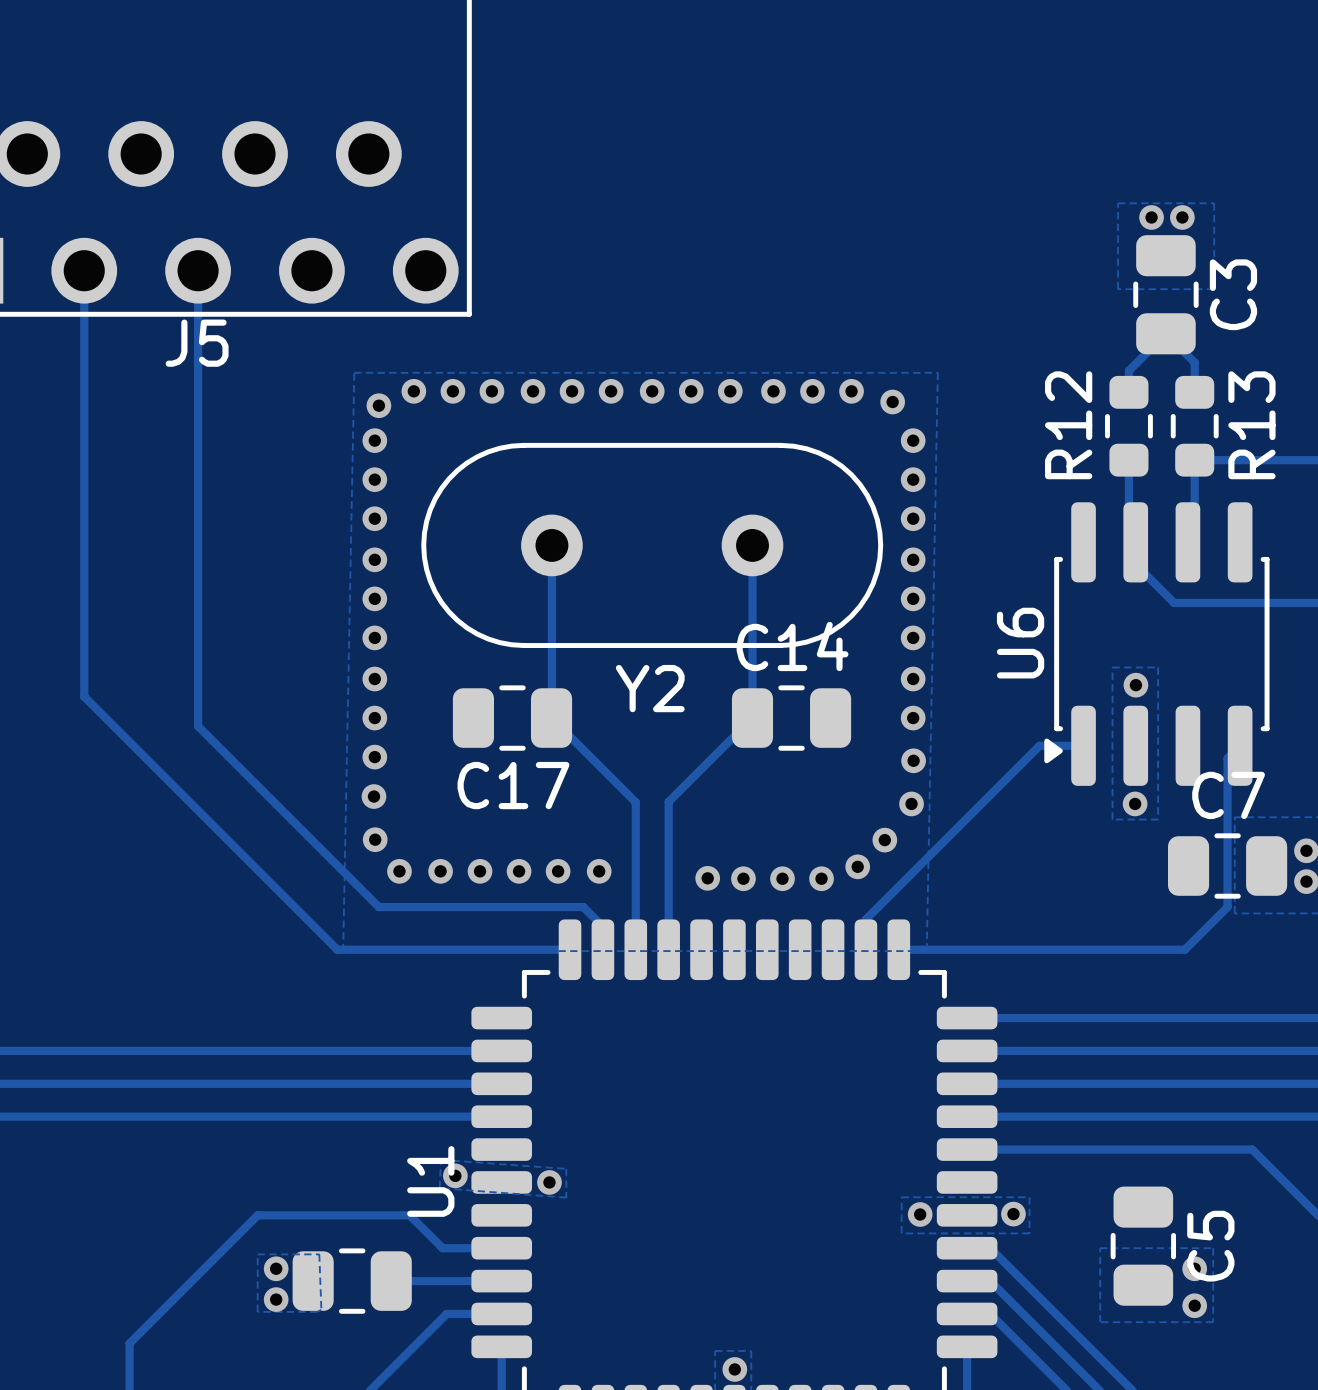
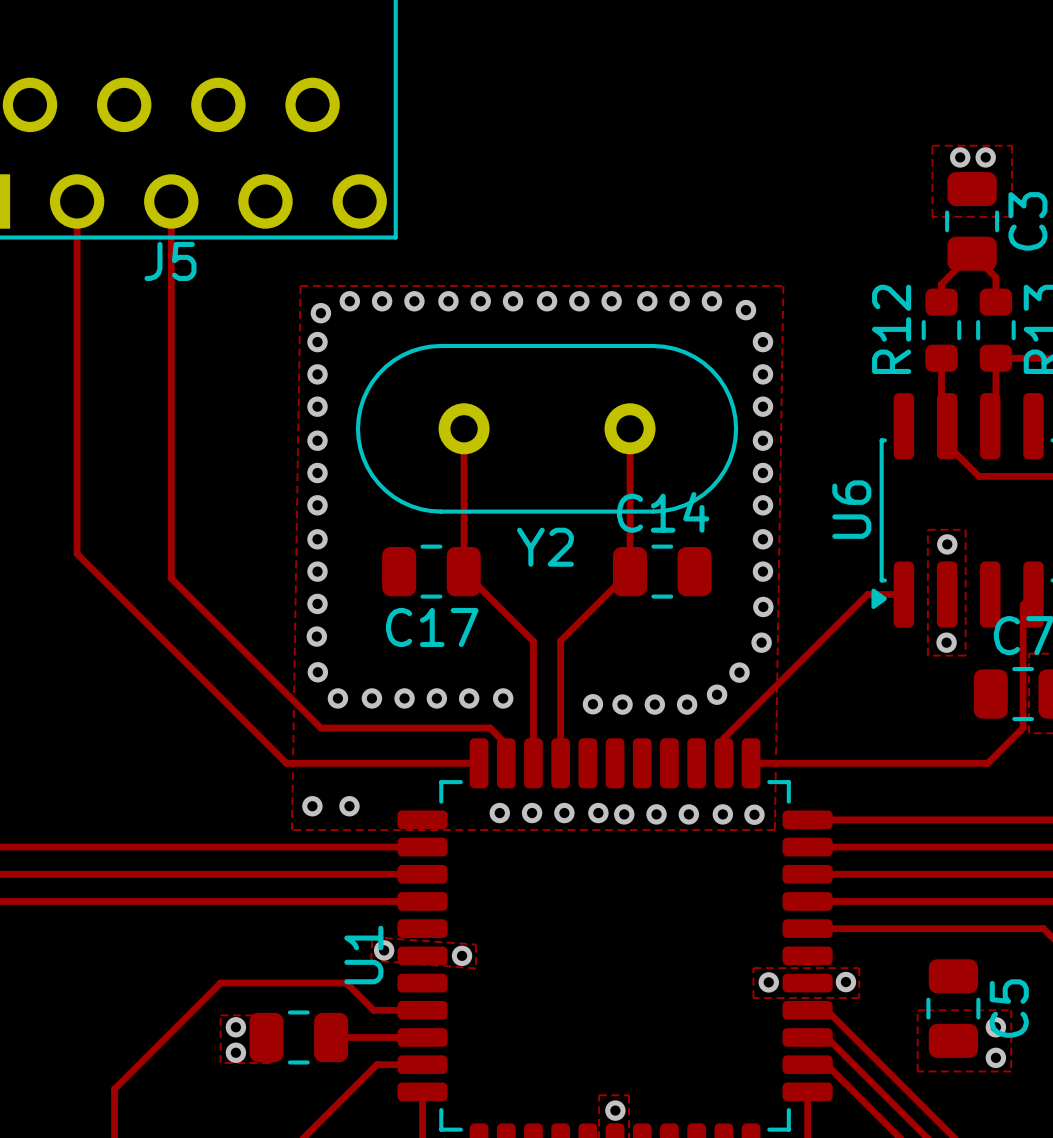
zone outline: (354, 372) (343, 951) (926, 951) (937, 372) -> (300, 285) (292, 830) (774, 830) (783, 285)
via: none -> (312, 806)
via: none -> (349, 806)
via: none -> (499, 813)
via: none -> (532, 813)
via: none -> (564, 813)
via: none -> (598, 813)
via: none -> (624, 814)
via: none -> (656, 814)
via: none -> (688, 814)
via: none -> (722, 814)
via: none -> (754, 814)

